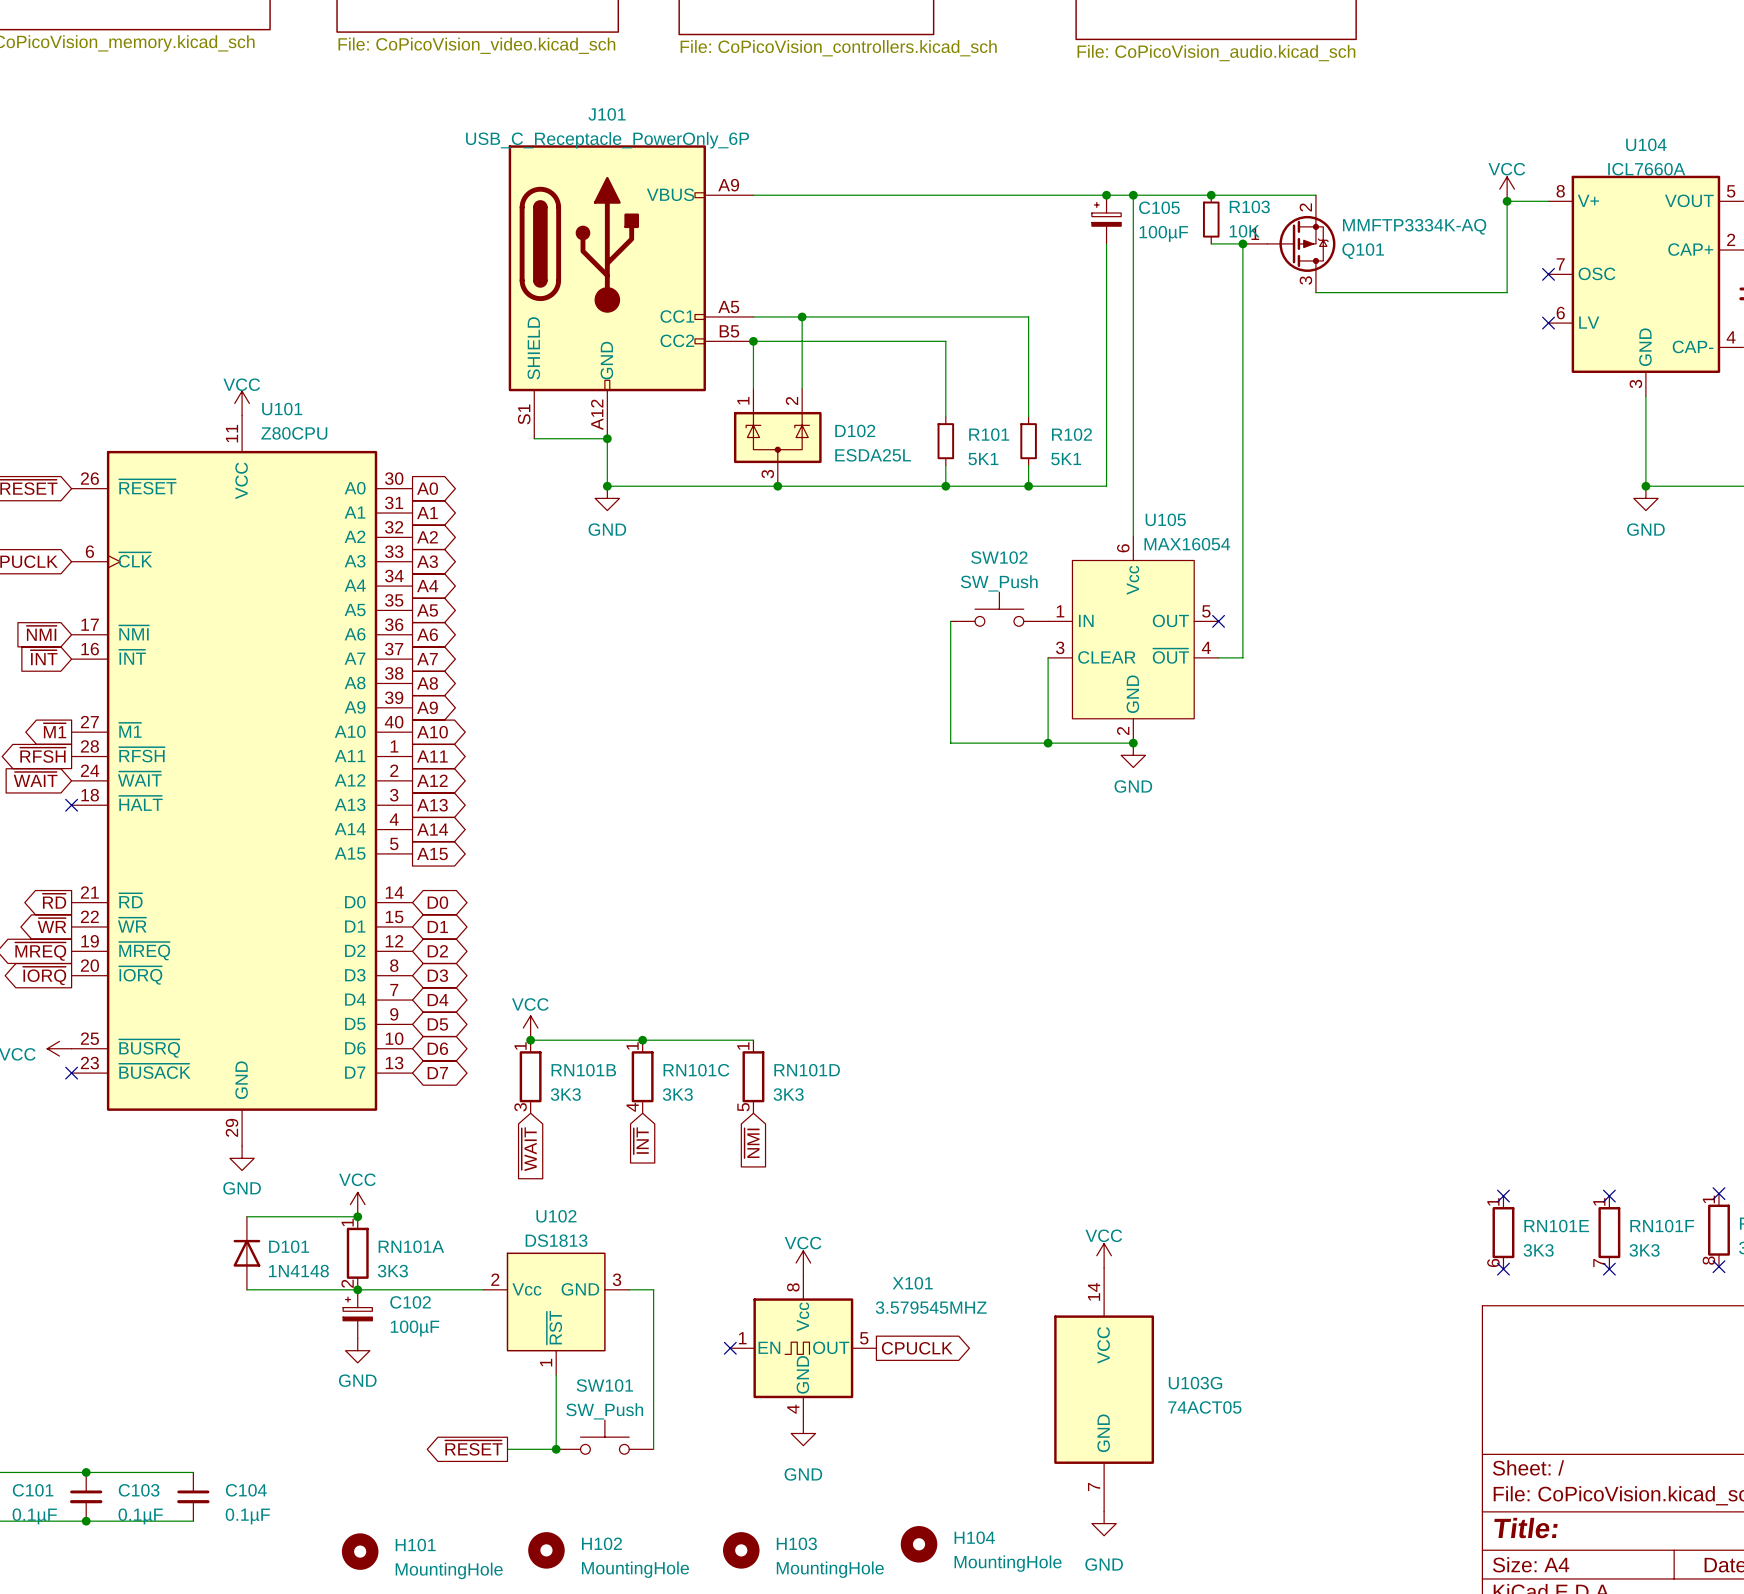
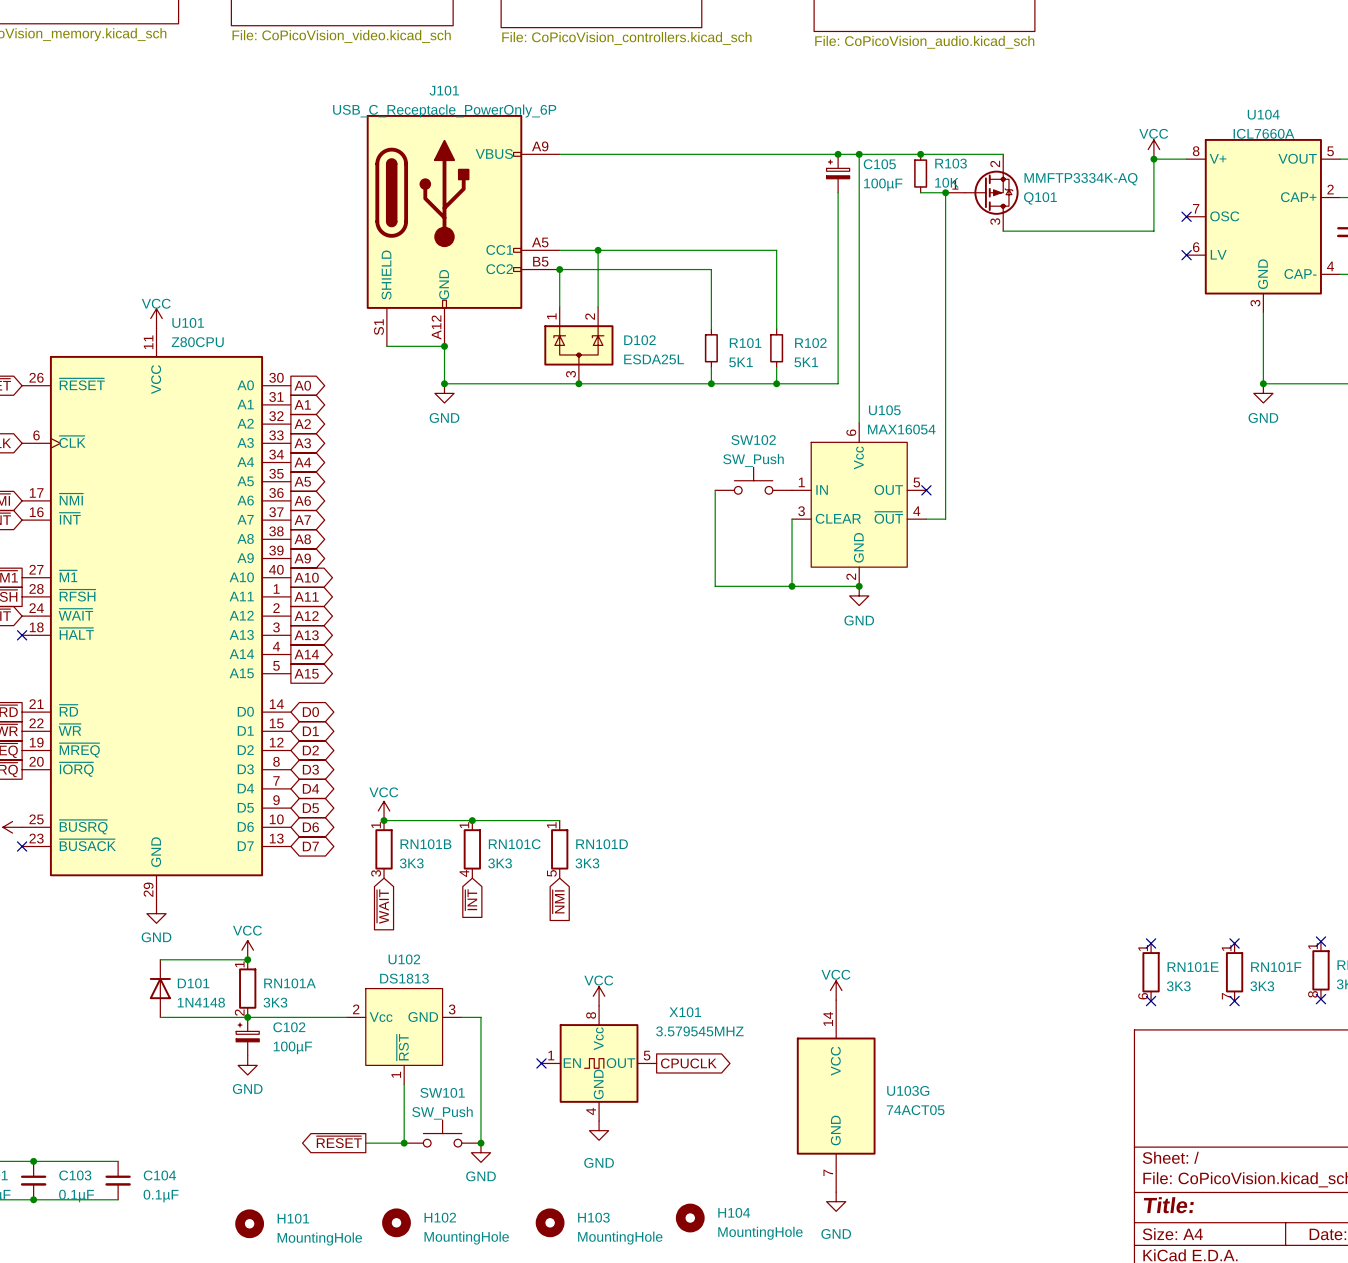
junction: none -> (480, 1143)
power symbol: none -> GND (480, 1152)

